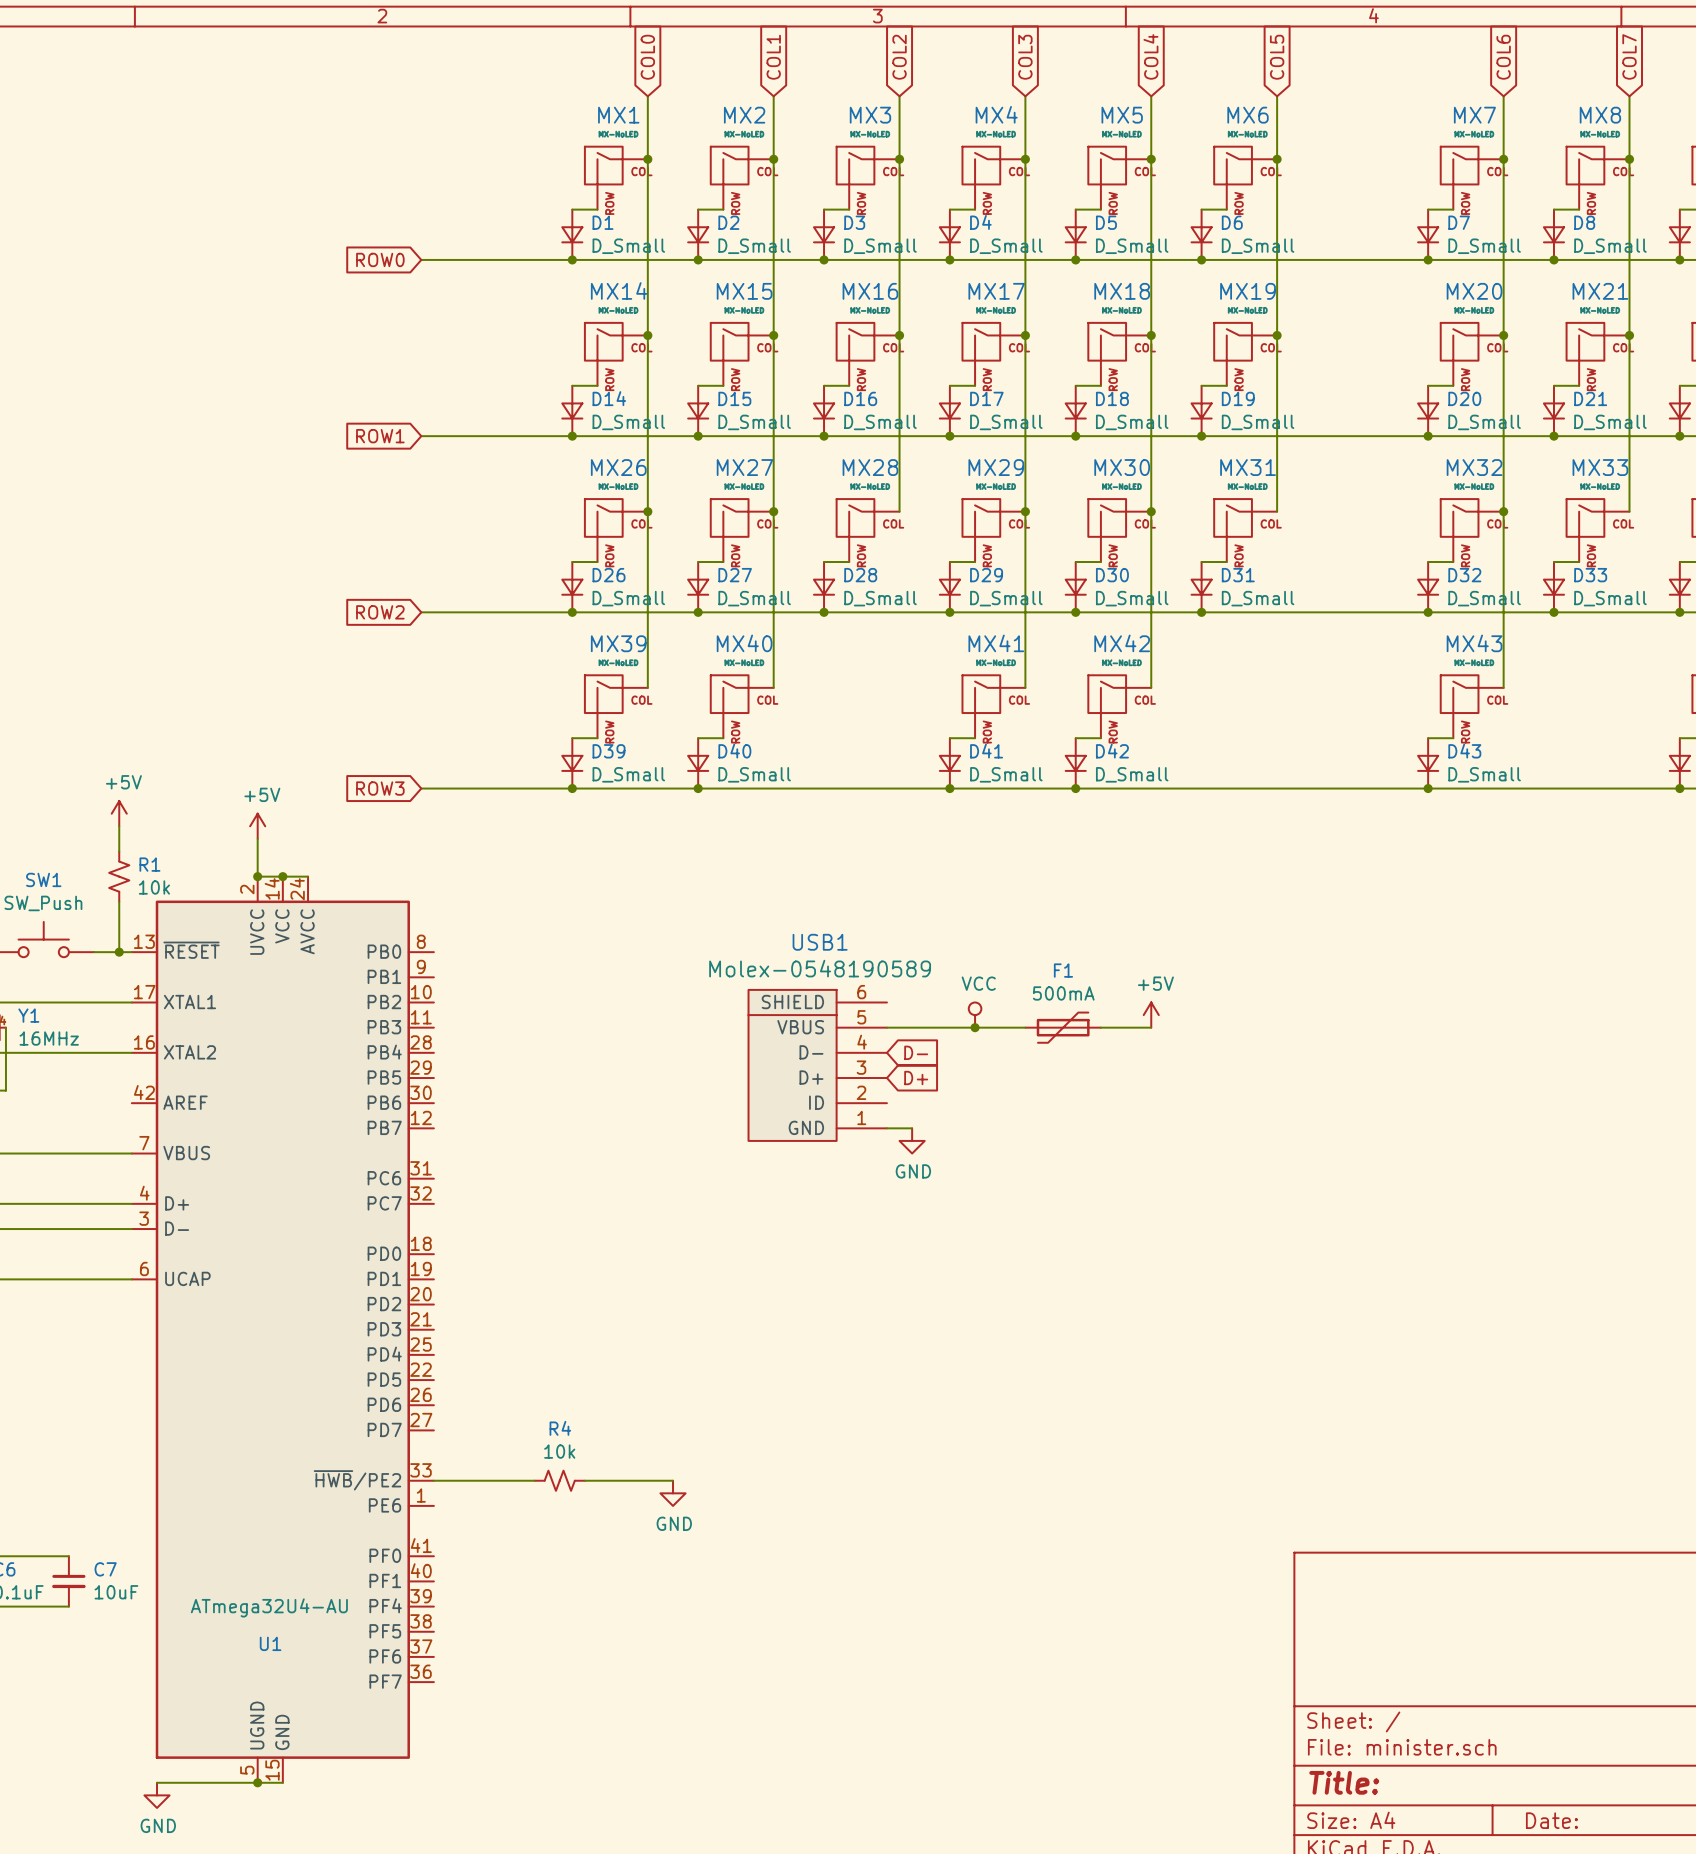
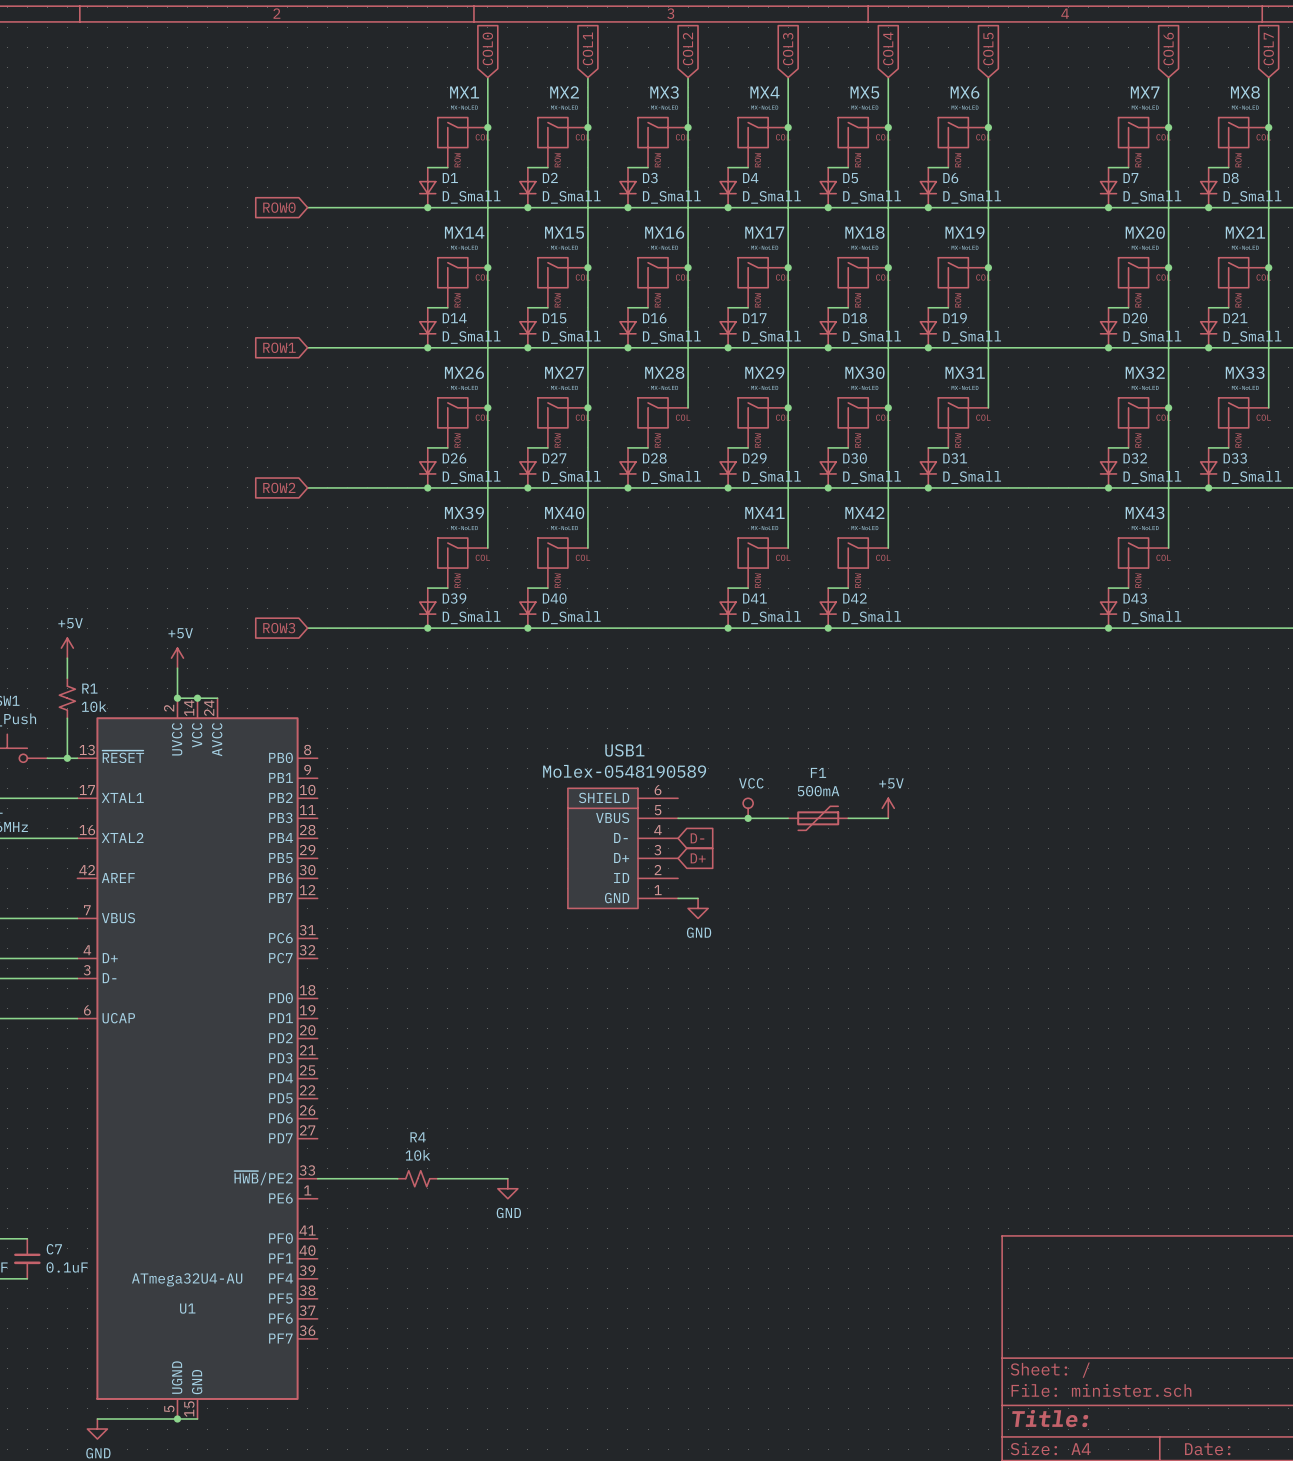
C7 value: 10uF (116, 1592) -> 0.1uF (67, 1267)

